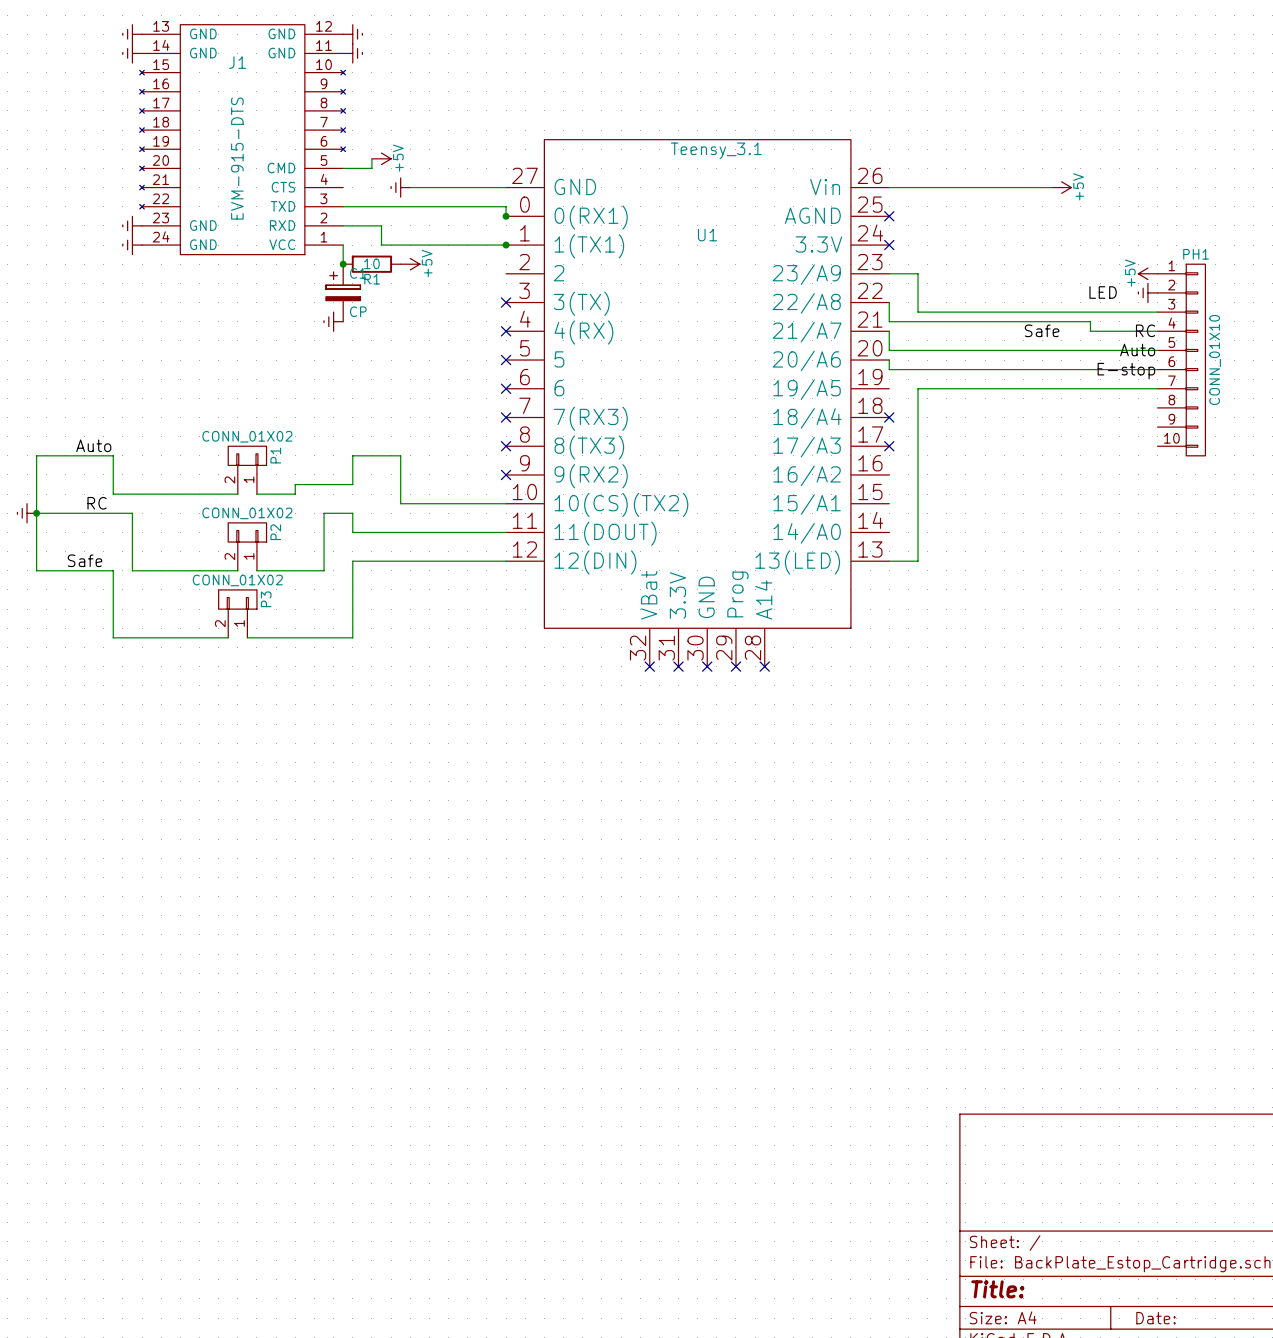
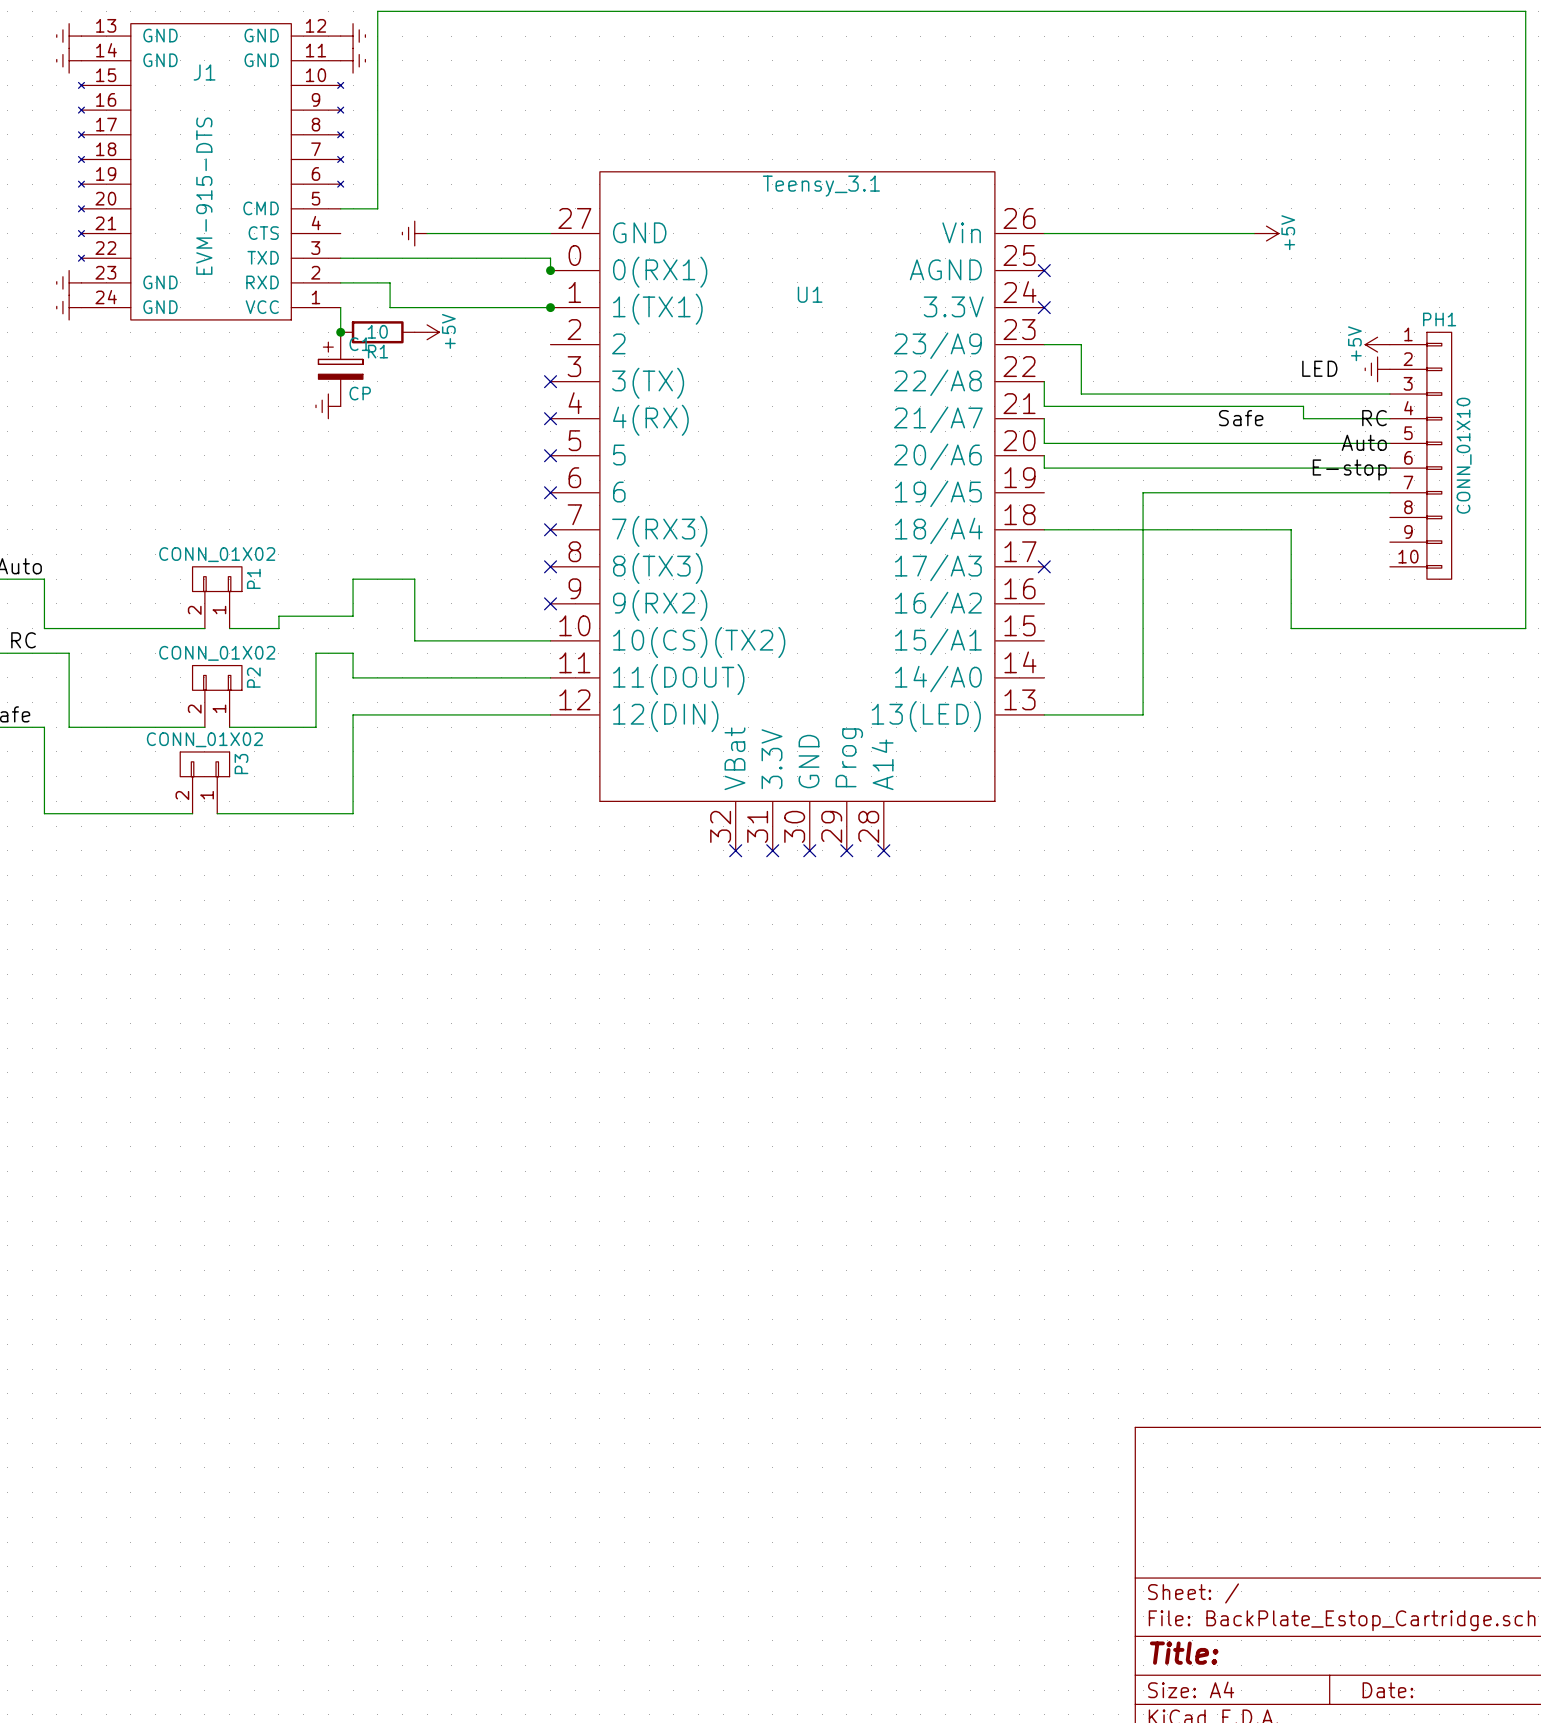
wire: none -> (377, 196) (377, 11) (1525, 11) (1525, 628) (1291, 628) (1291, 529) (1044, 529)
power symbol: +5V (381, 158) -> none
wire: (965, 388) (918, 388) (918, 561) -> (1143, 492) (1143, 714) (1081, 714)
no-connect mark: (889, 417) -> none

